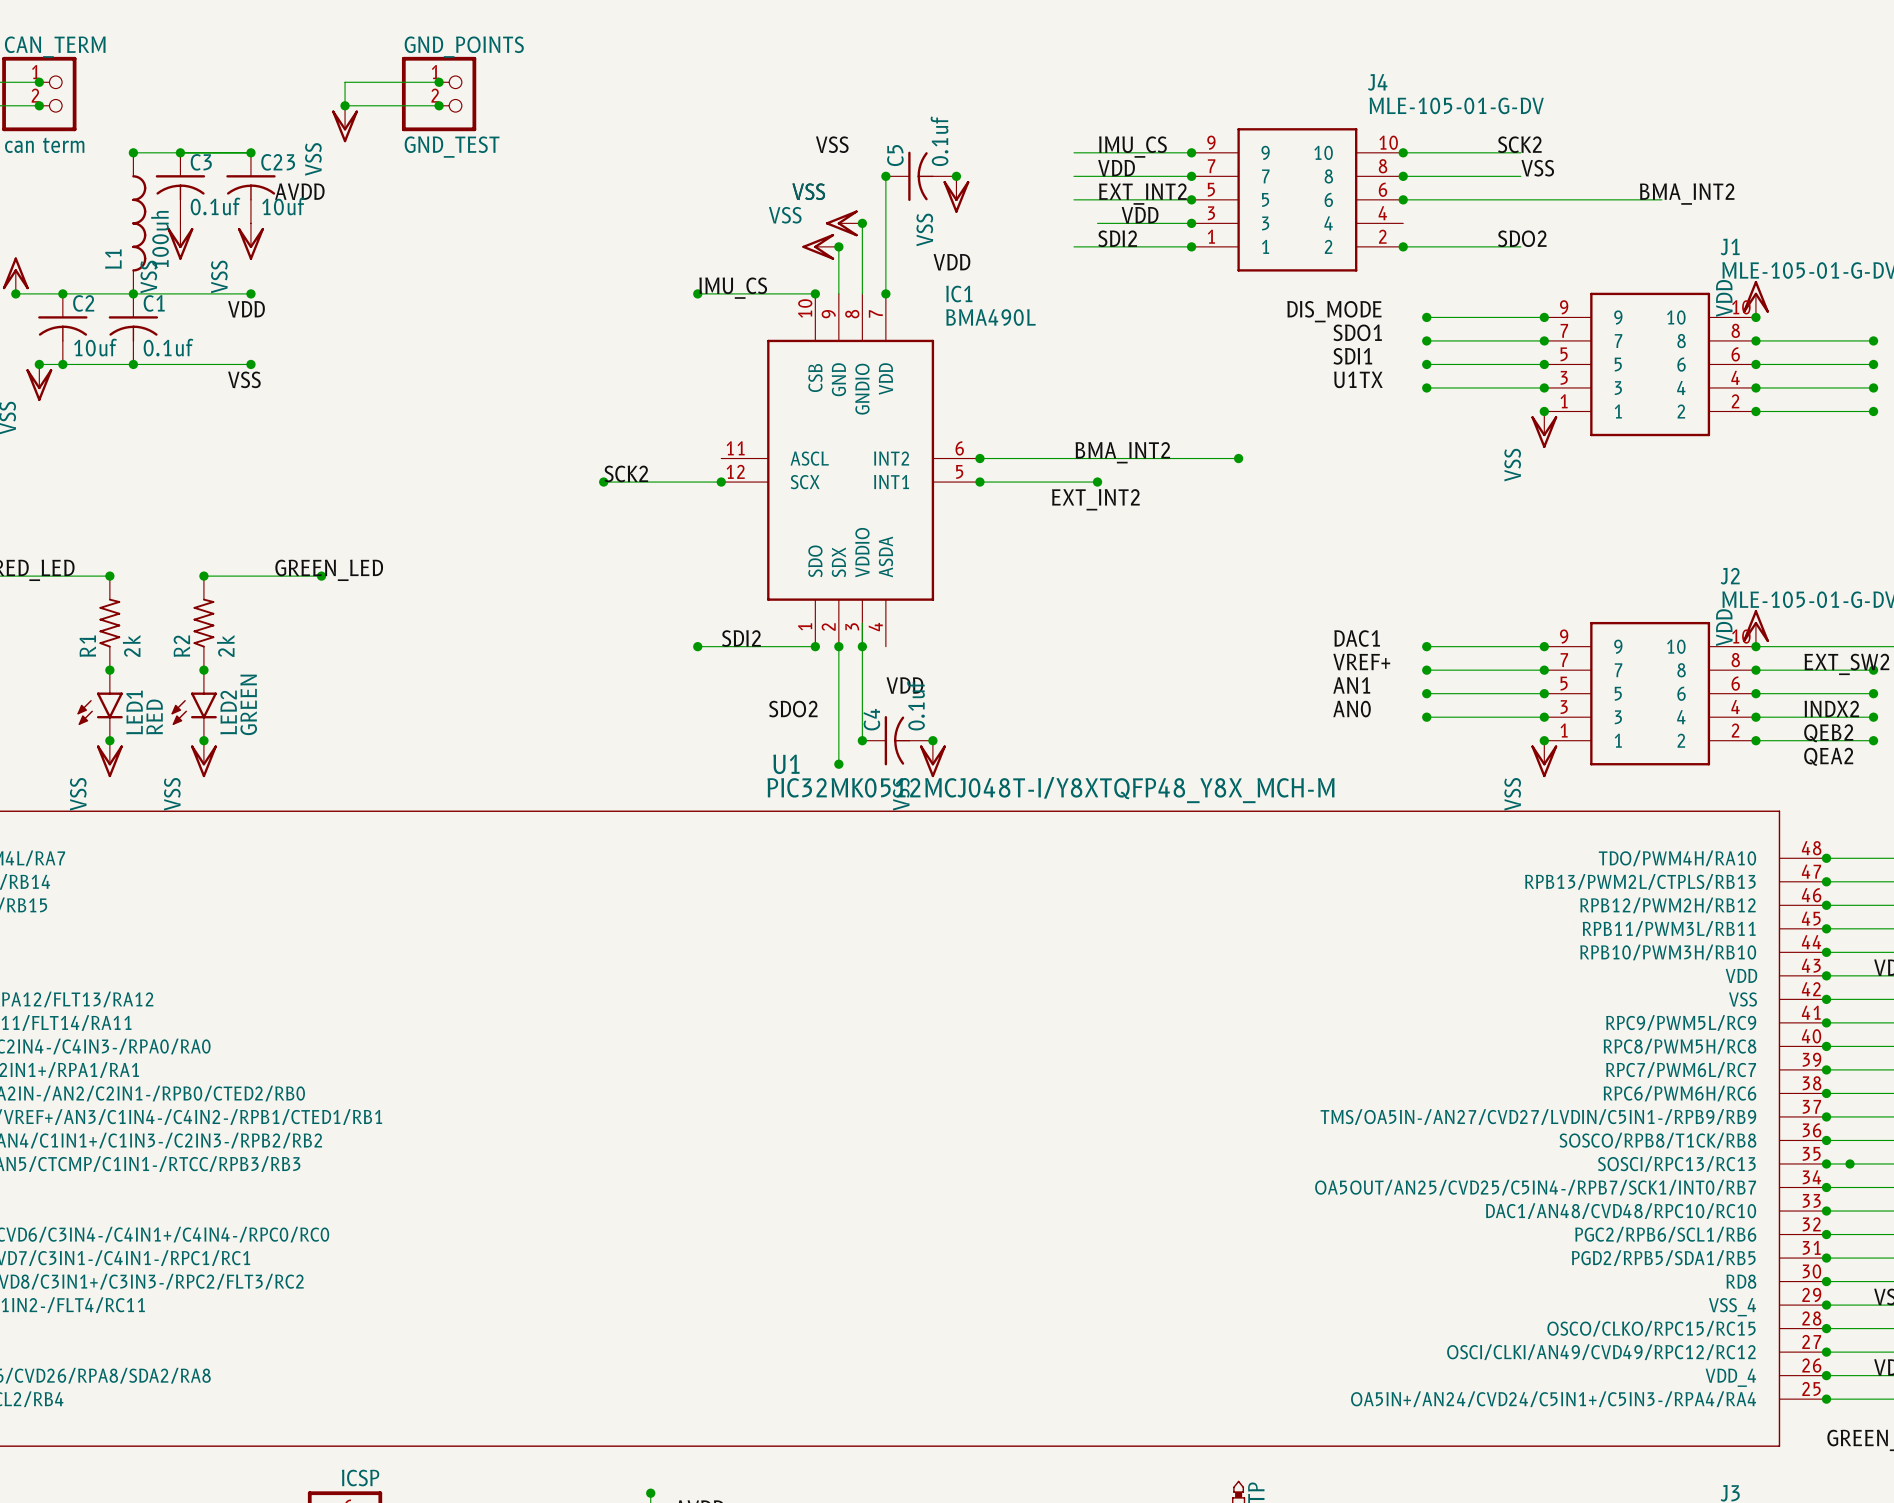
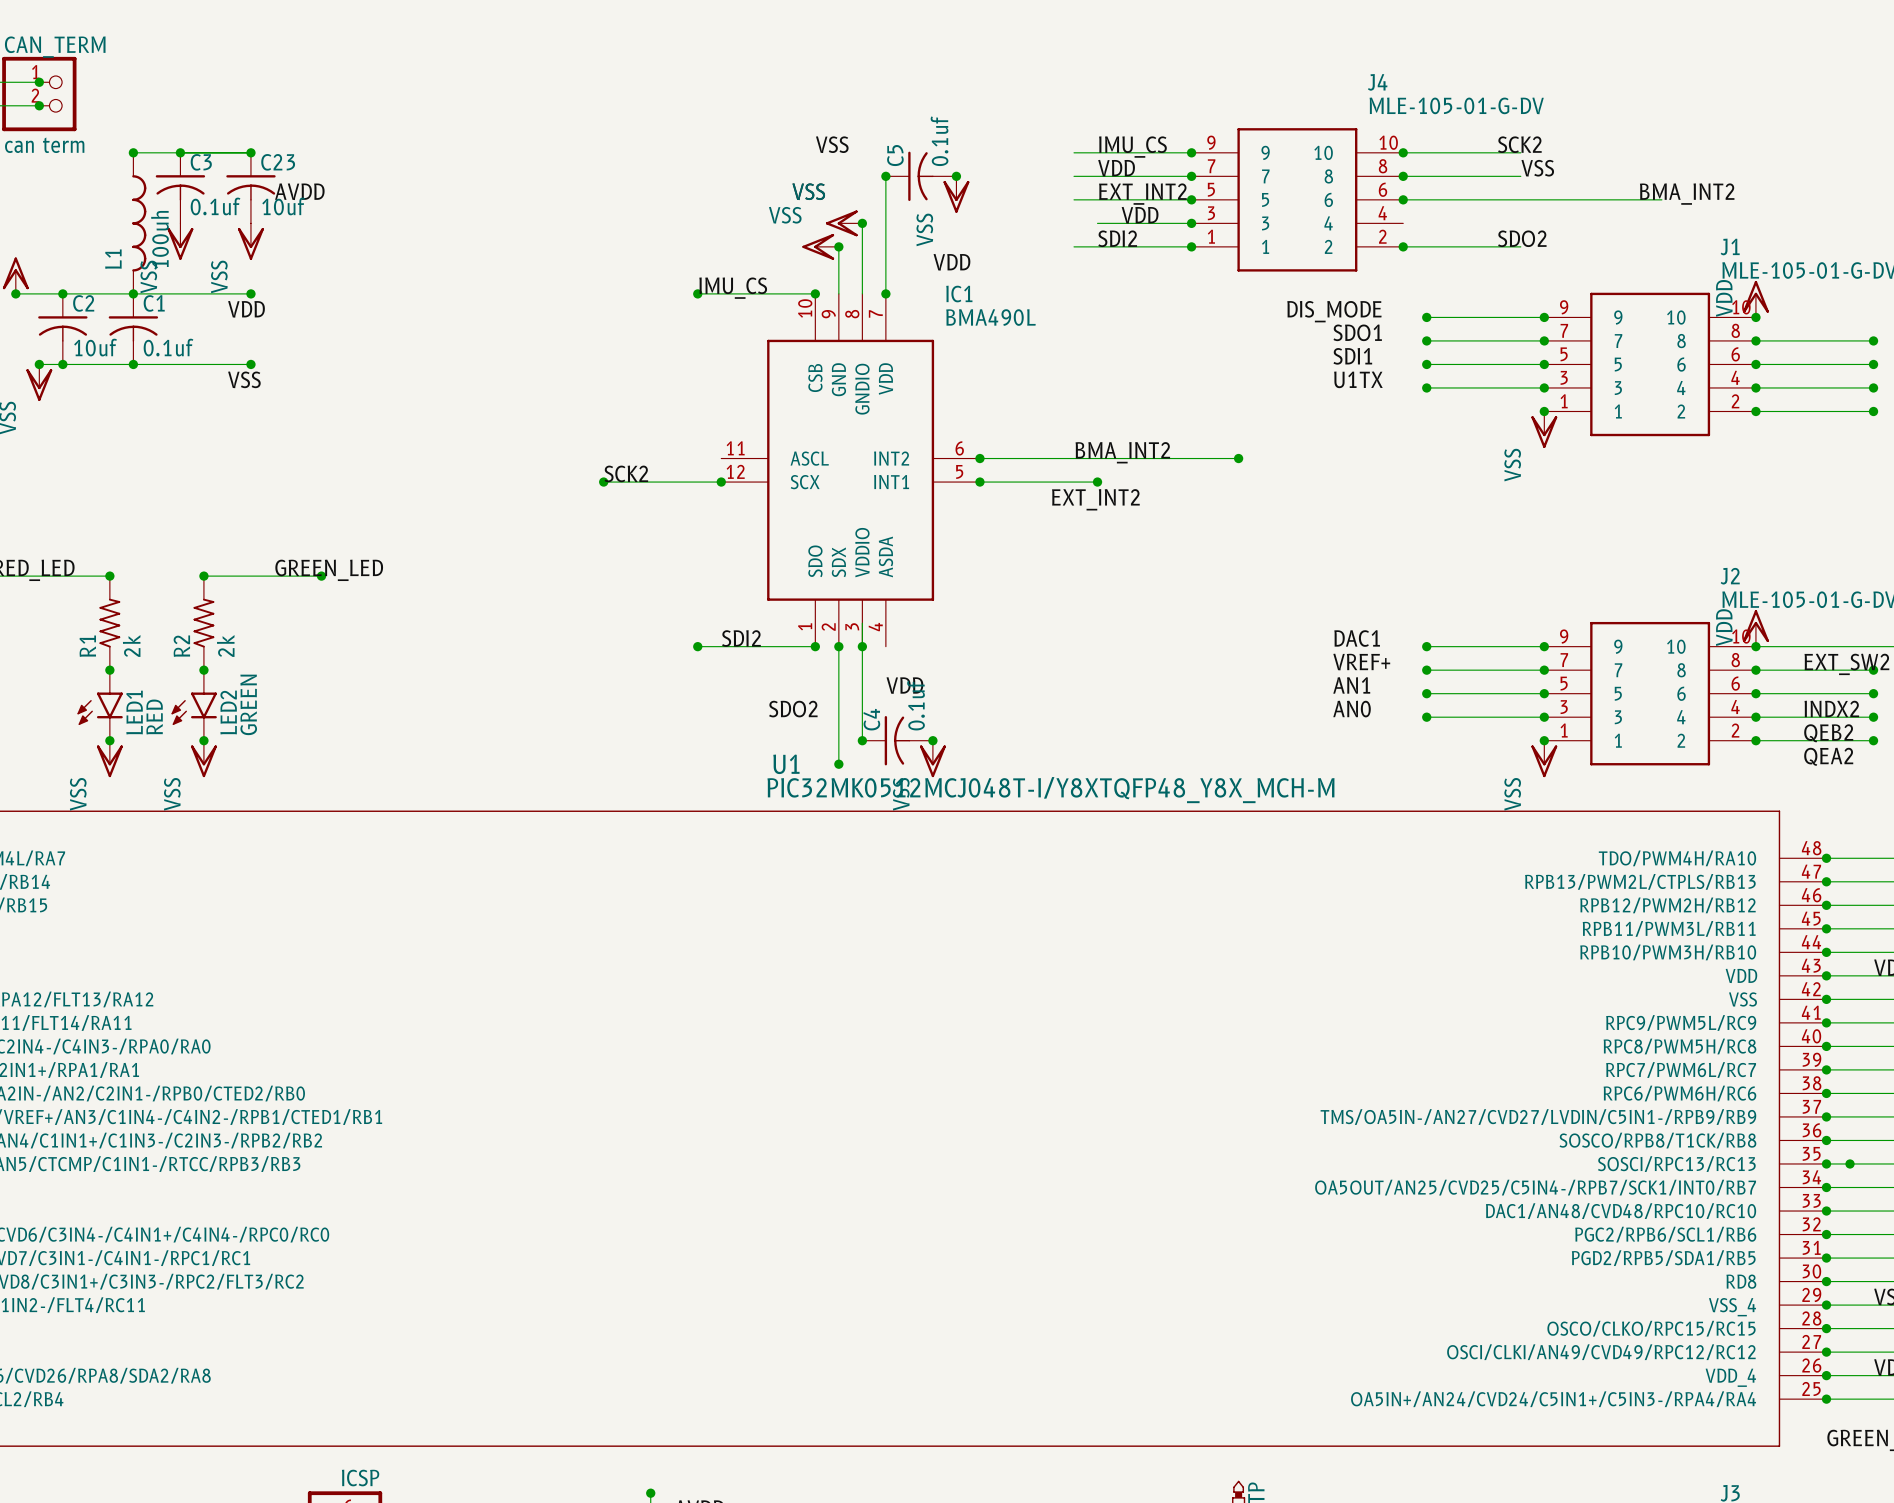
wire: (439, 82) (345, 82) (345, 105) (439, 105) -> none
junction: (439, 82) -> none
GND_POINTS: GND_TEST (439, 94) -> none
junction: (345, 105) -> none
junction: (439, 105) -> none
power symbol: VSS (345, 124) -> none

